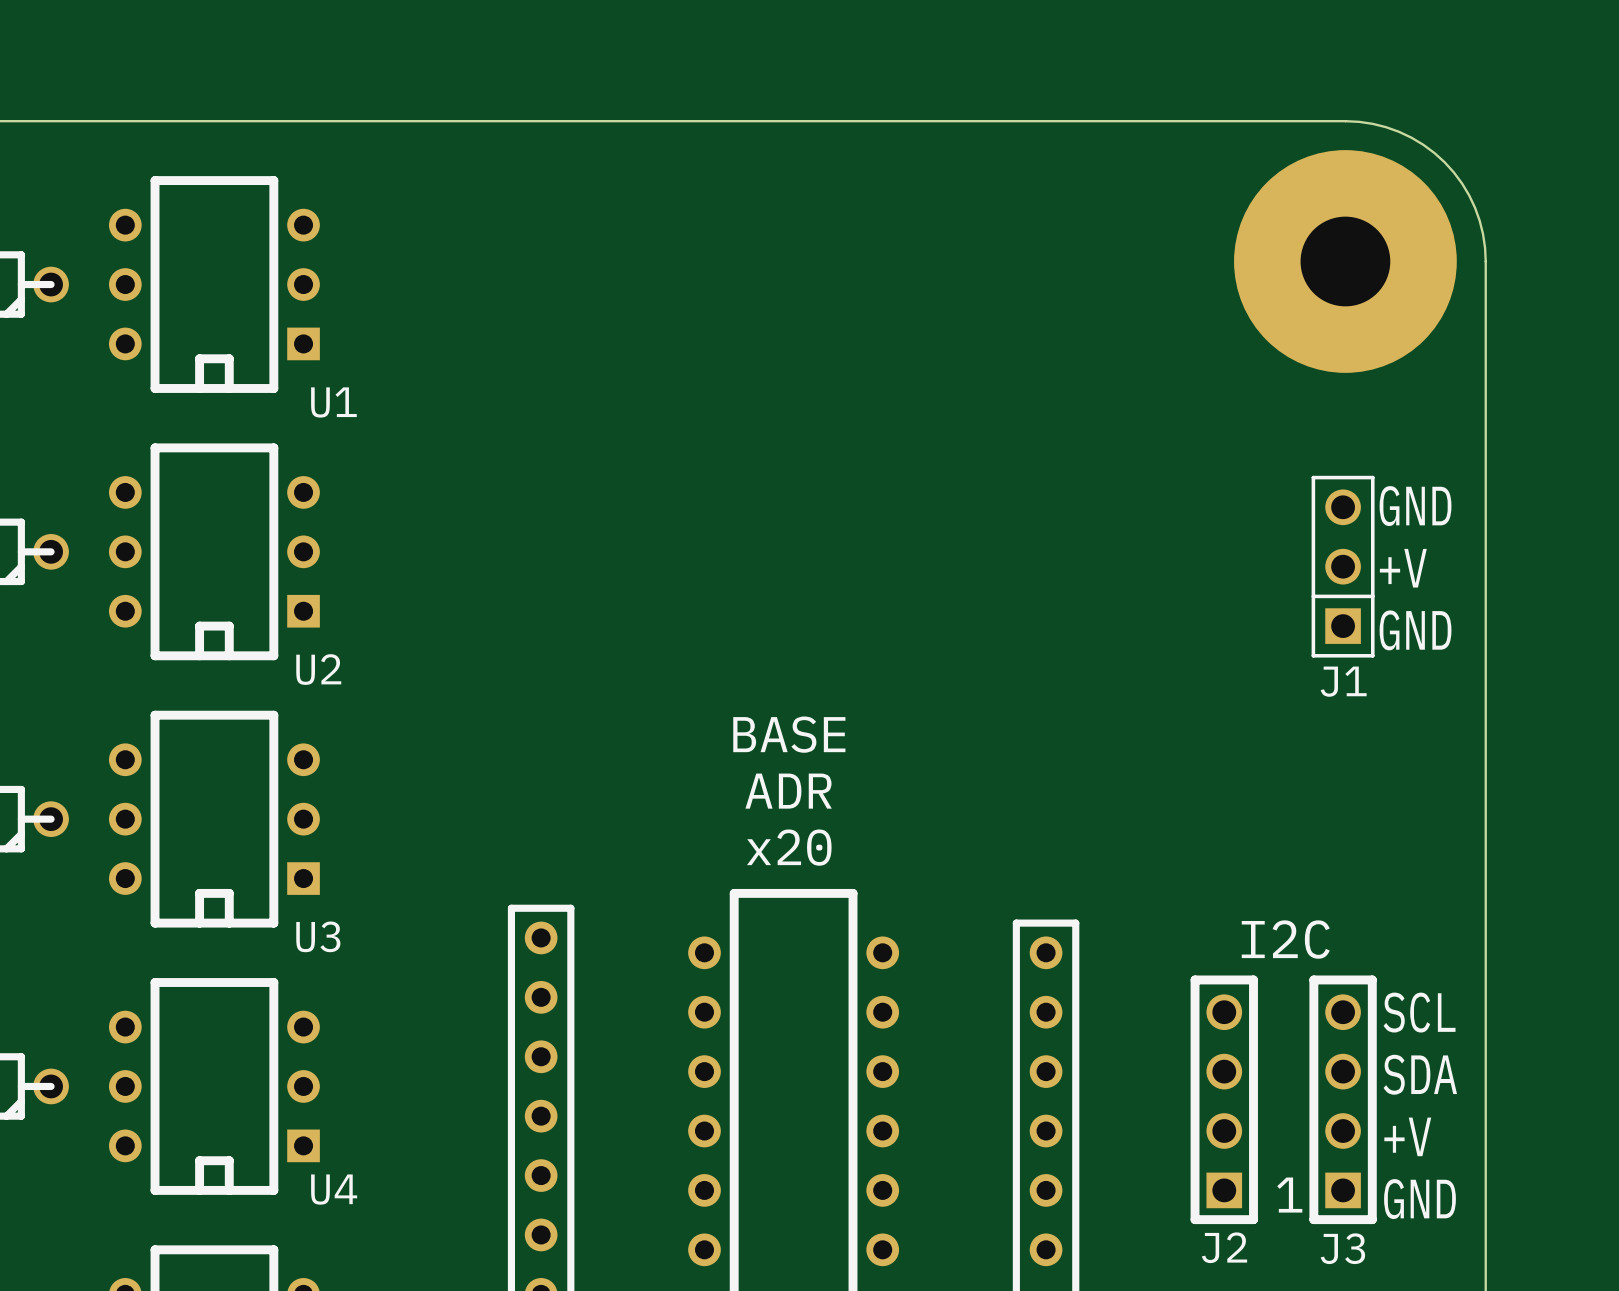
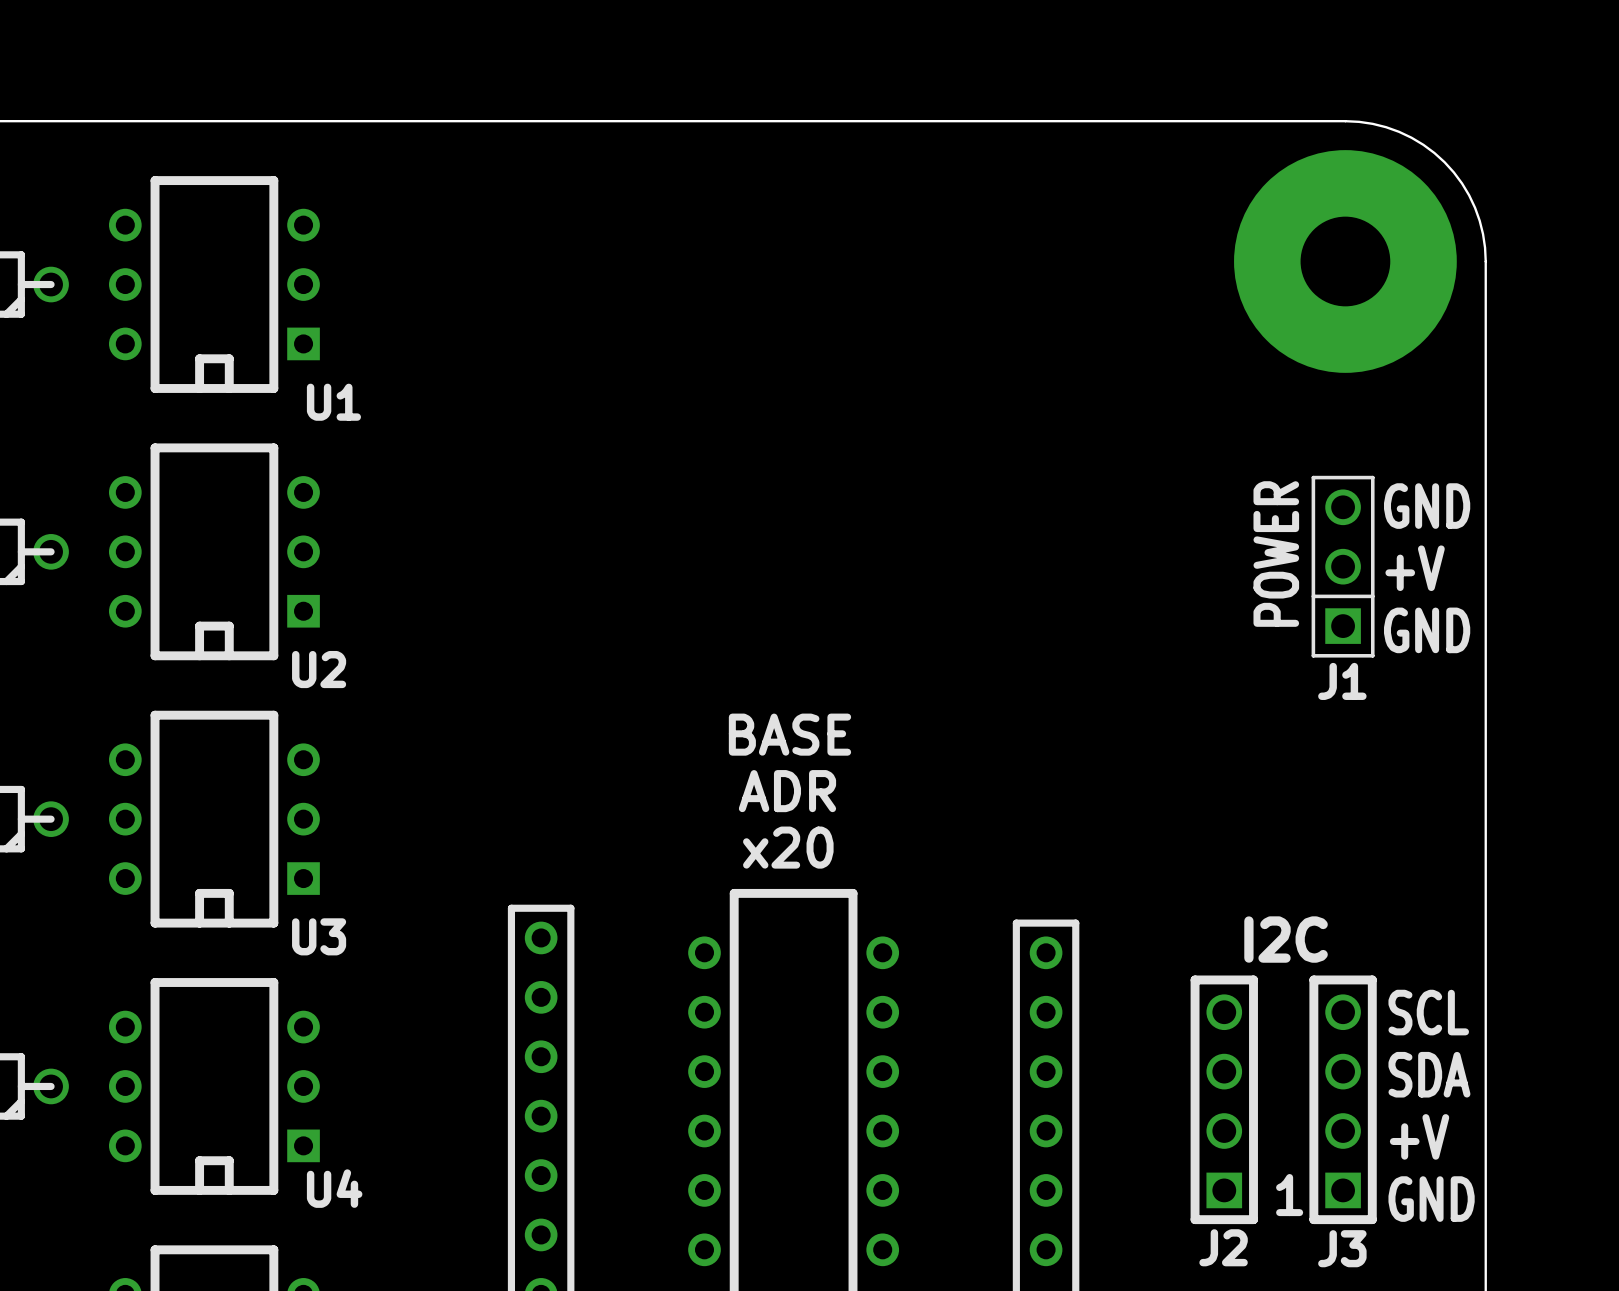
text: none -> POWER (1276, 554)

